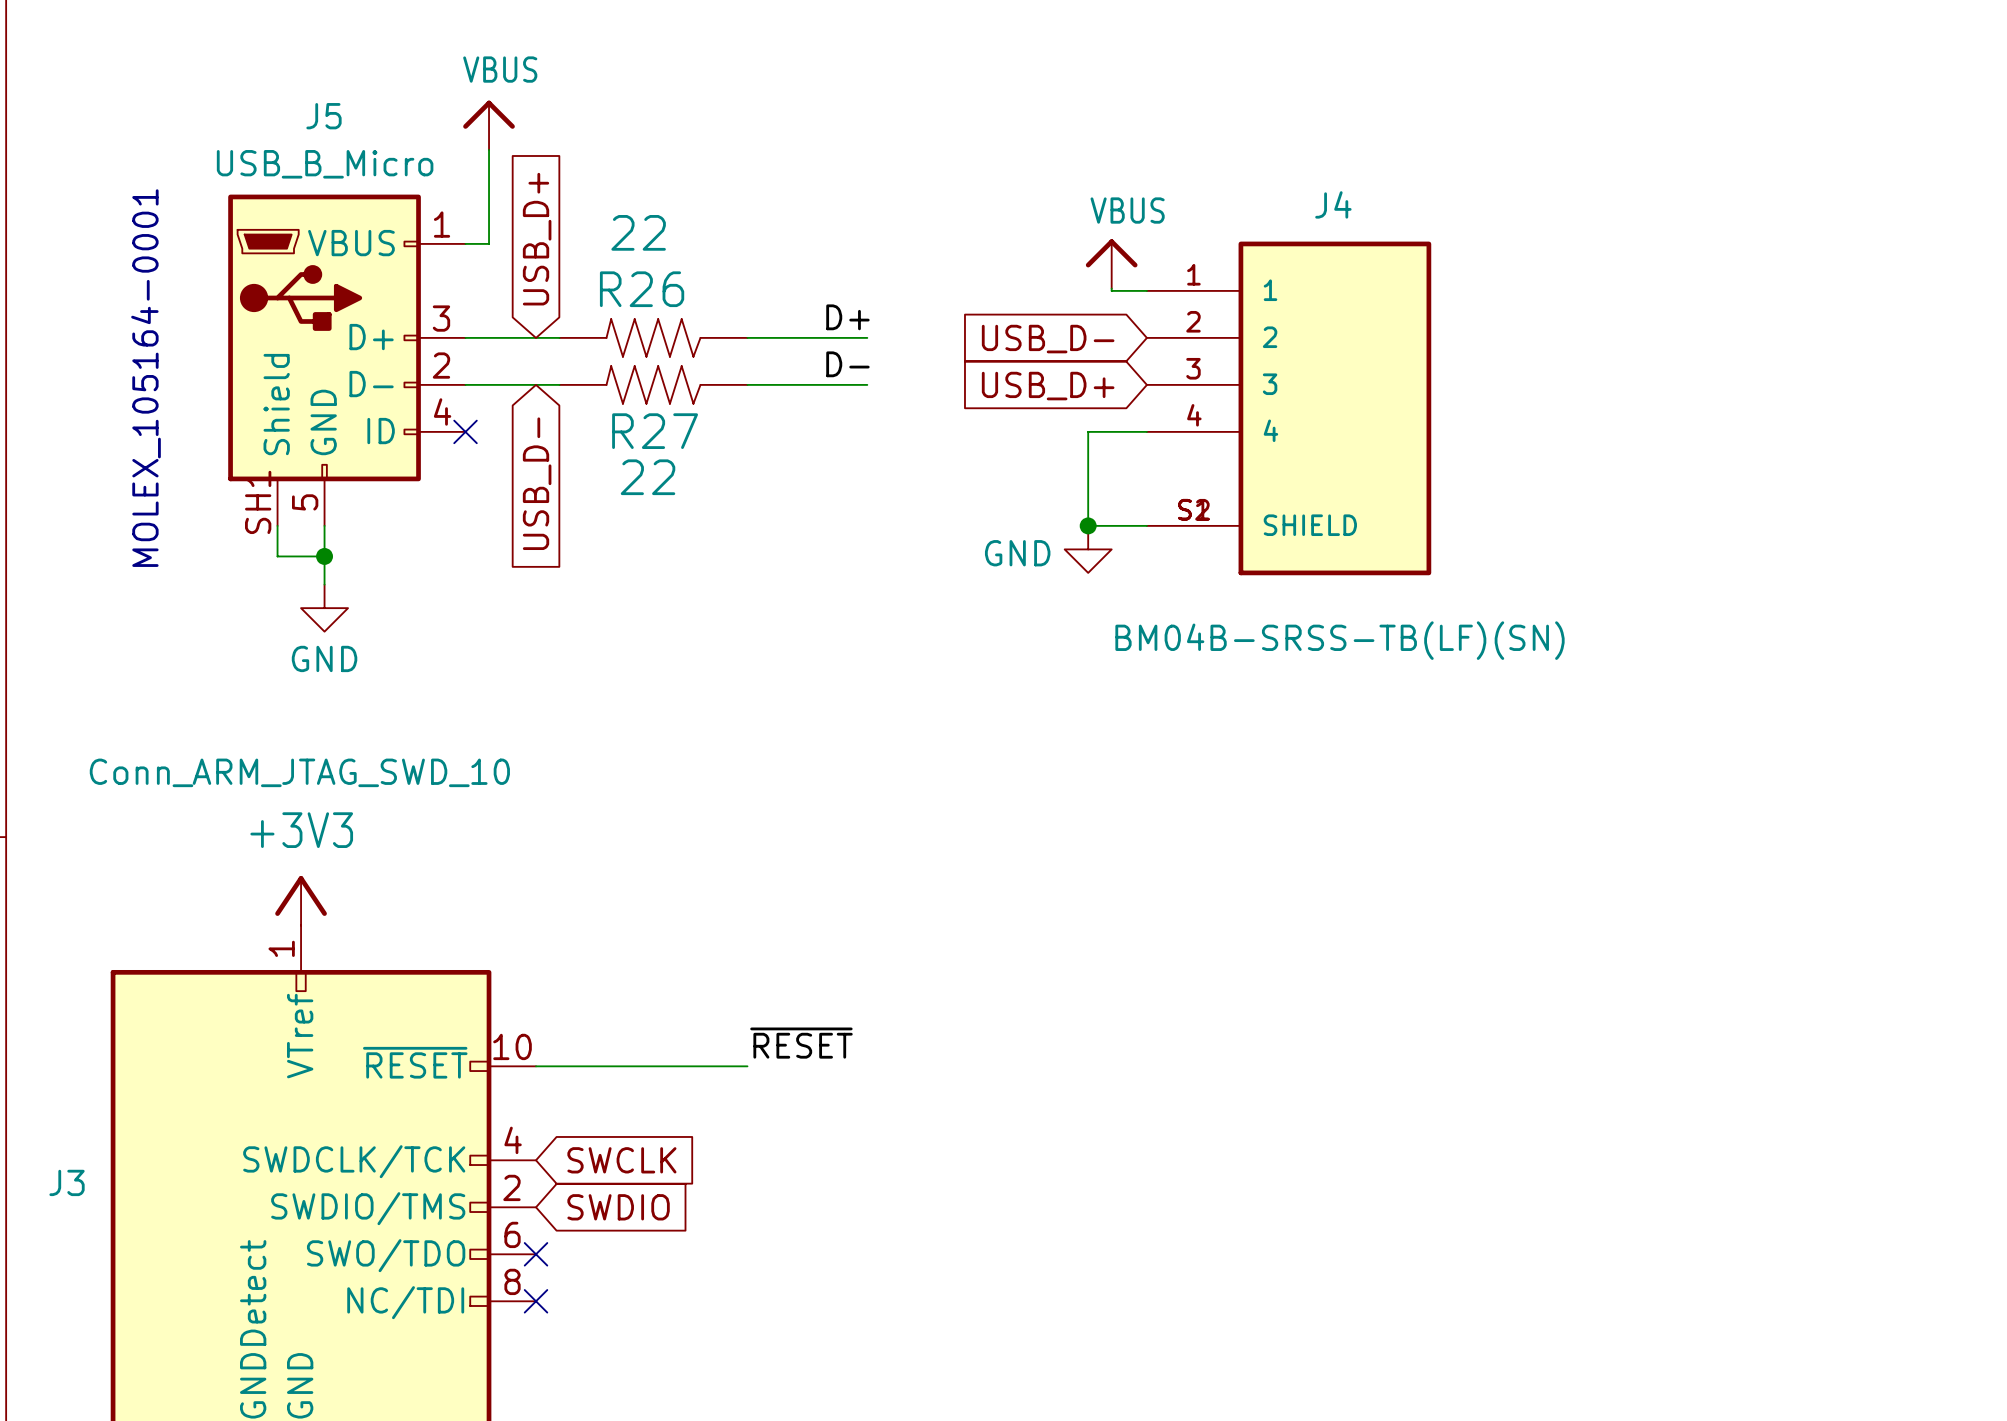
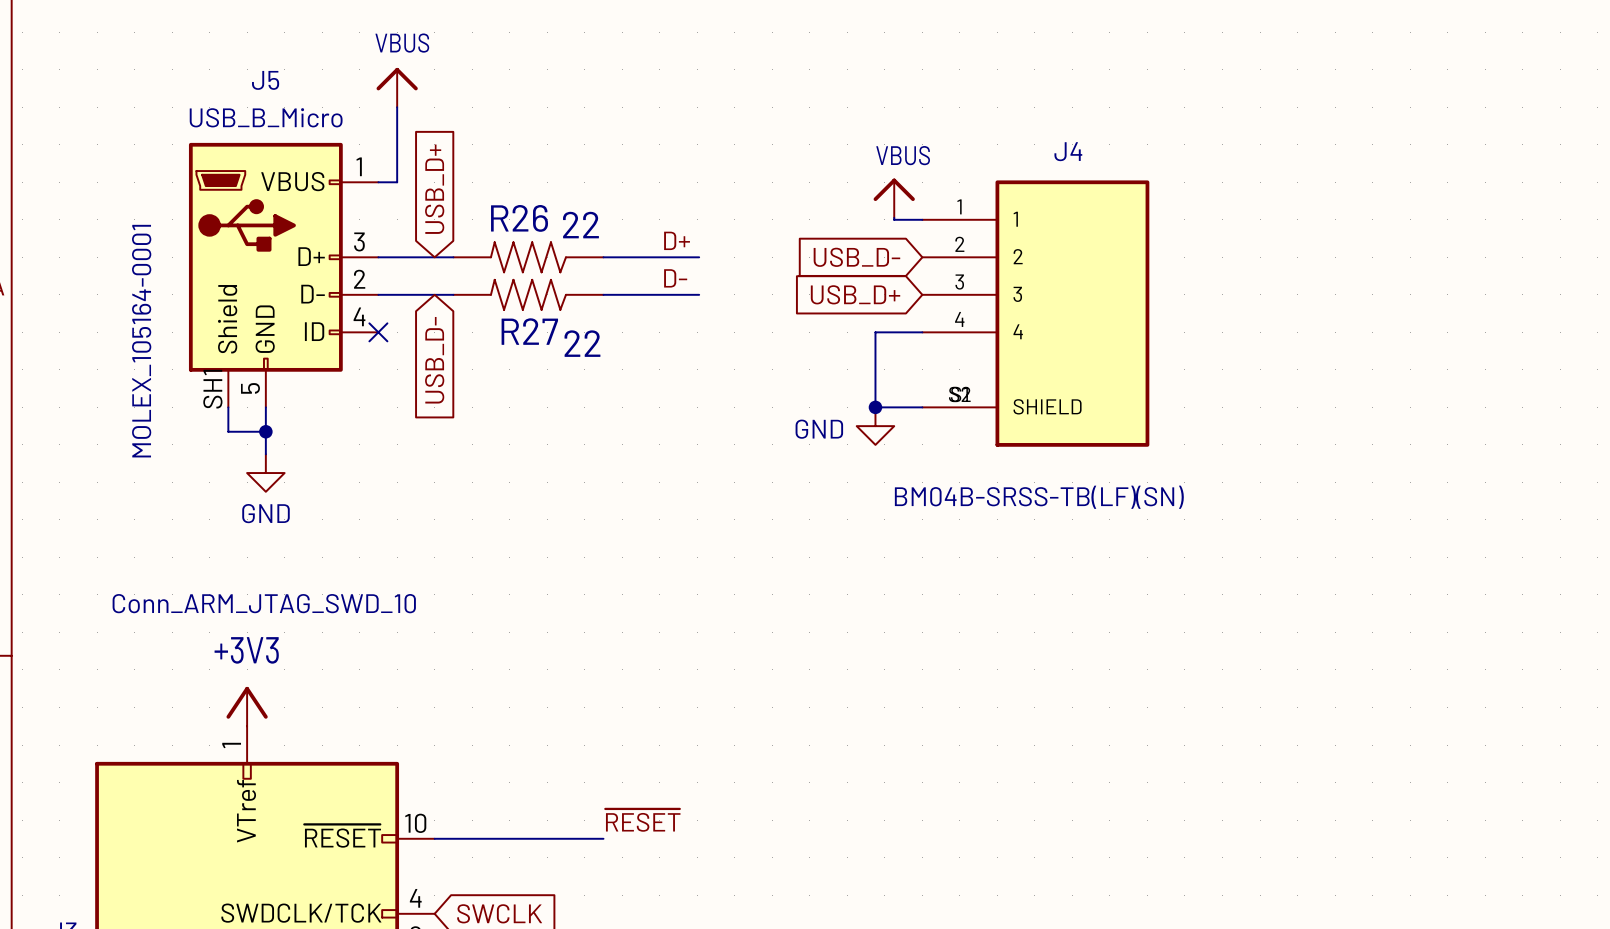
R26 value position: 22 (638, 232) -> 22 (580, 225)
text position: MOLEX_105164-0001 (146, 378) -> MOLEX_105164-0001 (141, 341)
R27 value position: 22 (648, 477) -> 22 (582, 343)

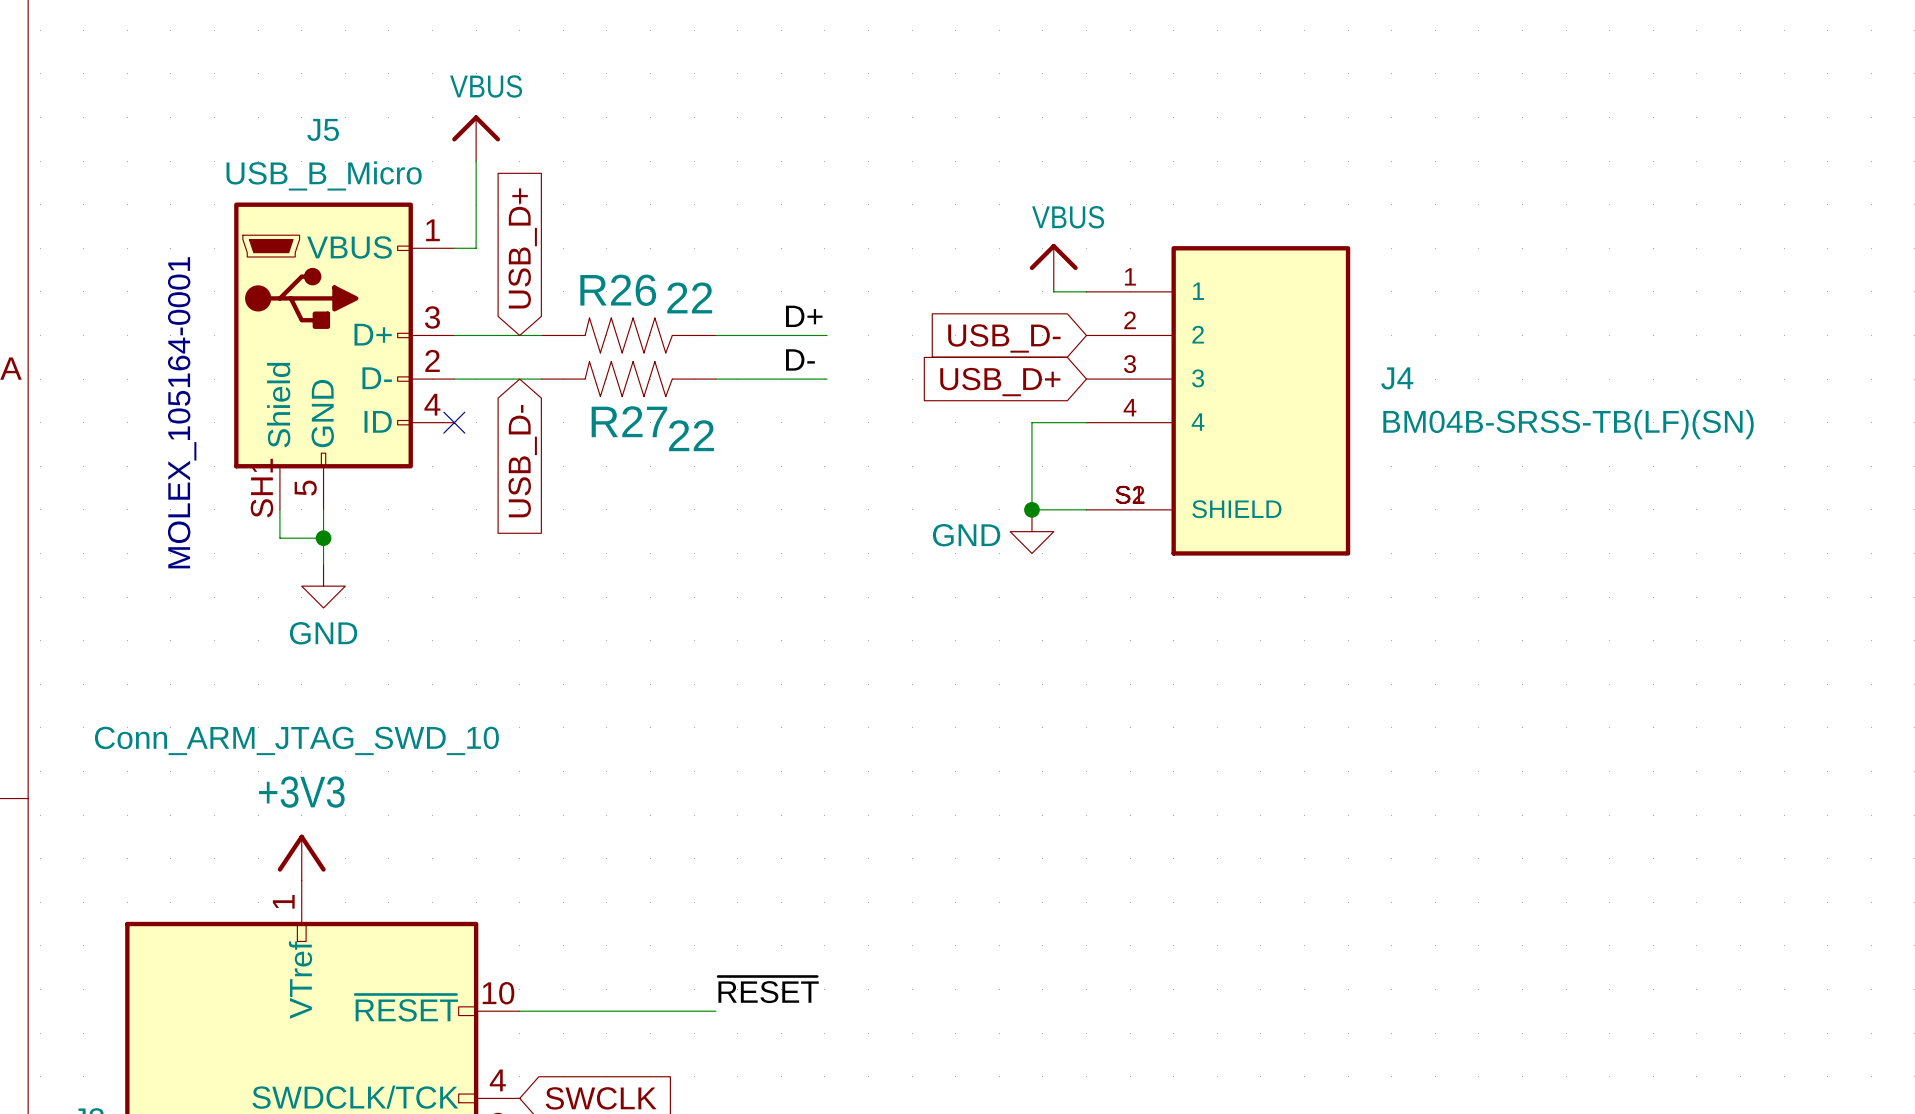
J4 name position: J4 (1068, 151) -> J4 (1397, 378)
J4 value position: BM04B-SRSS-TB(LF)(SN) (1039, 497) -> BM04B-SRSS-TB(LF)(SN) (1568, 424)

